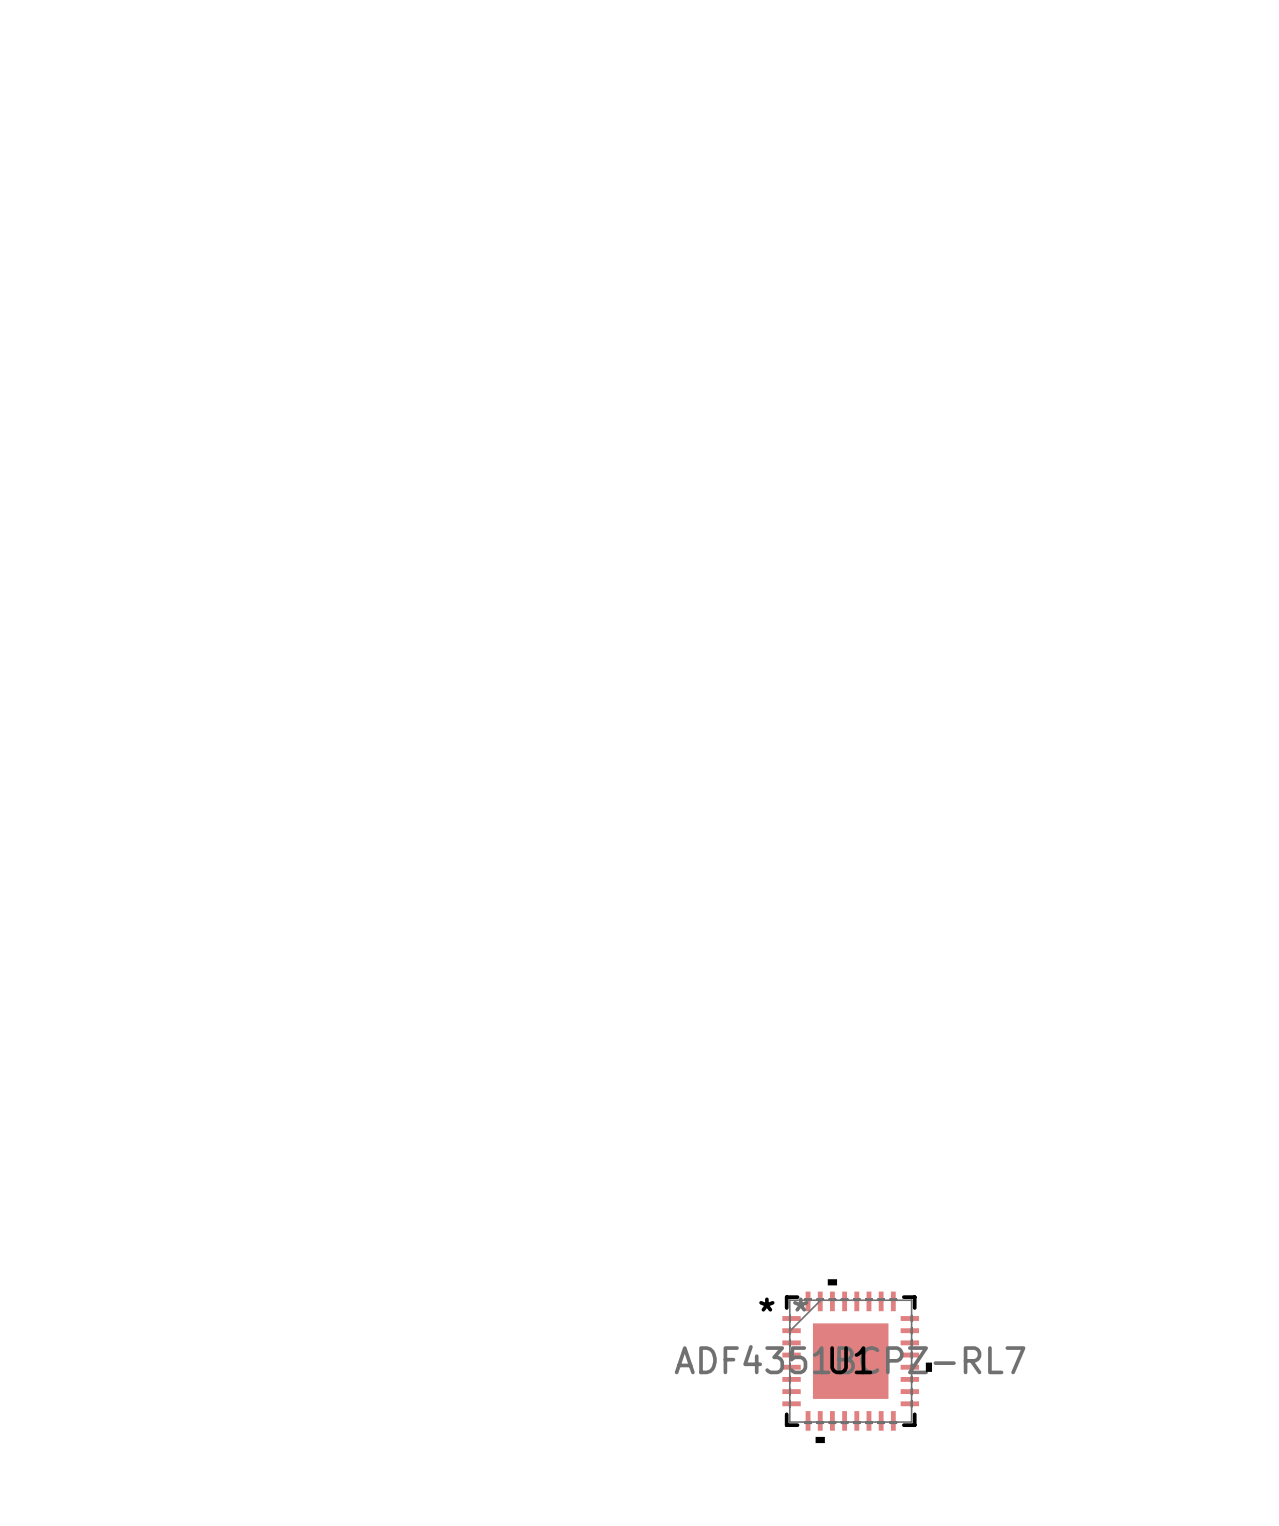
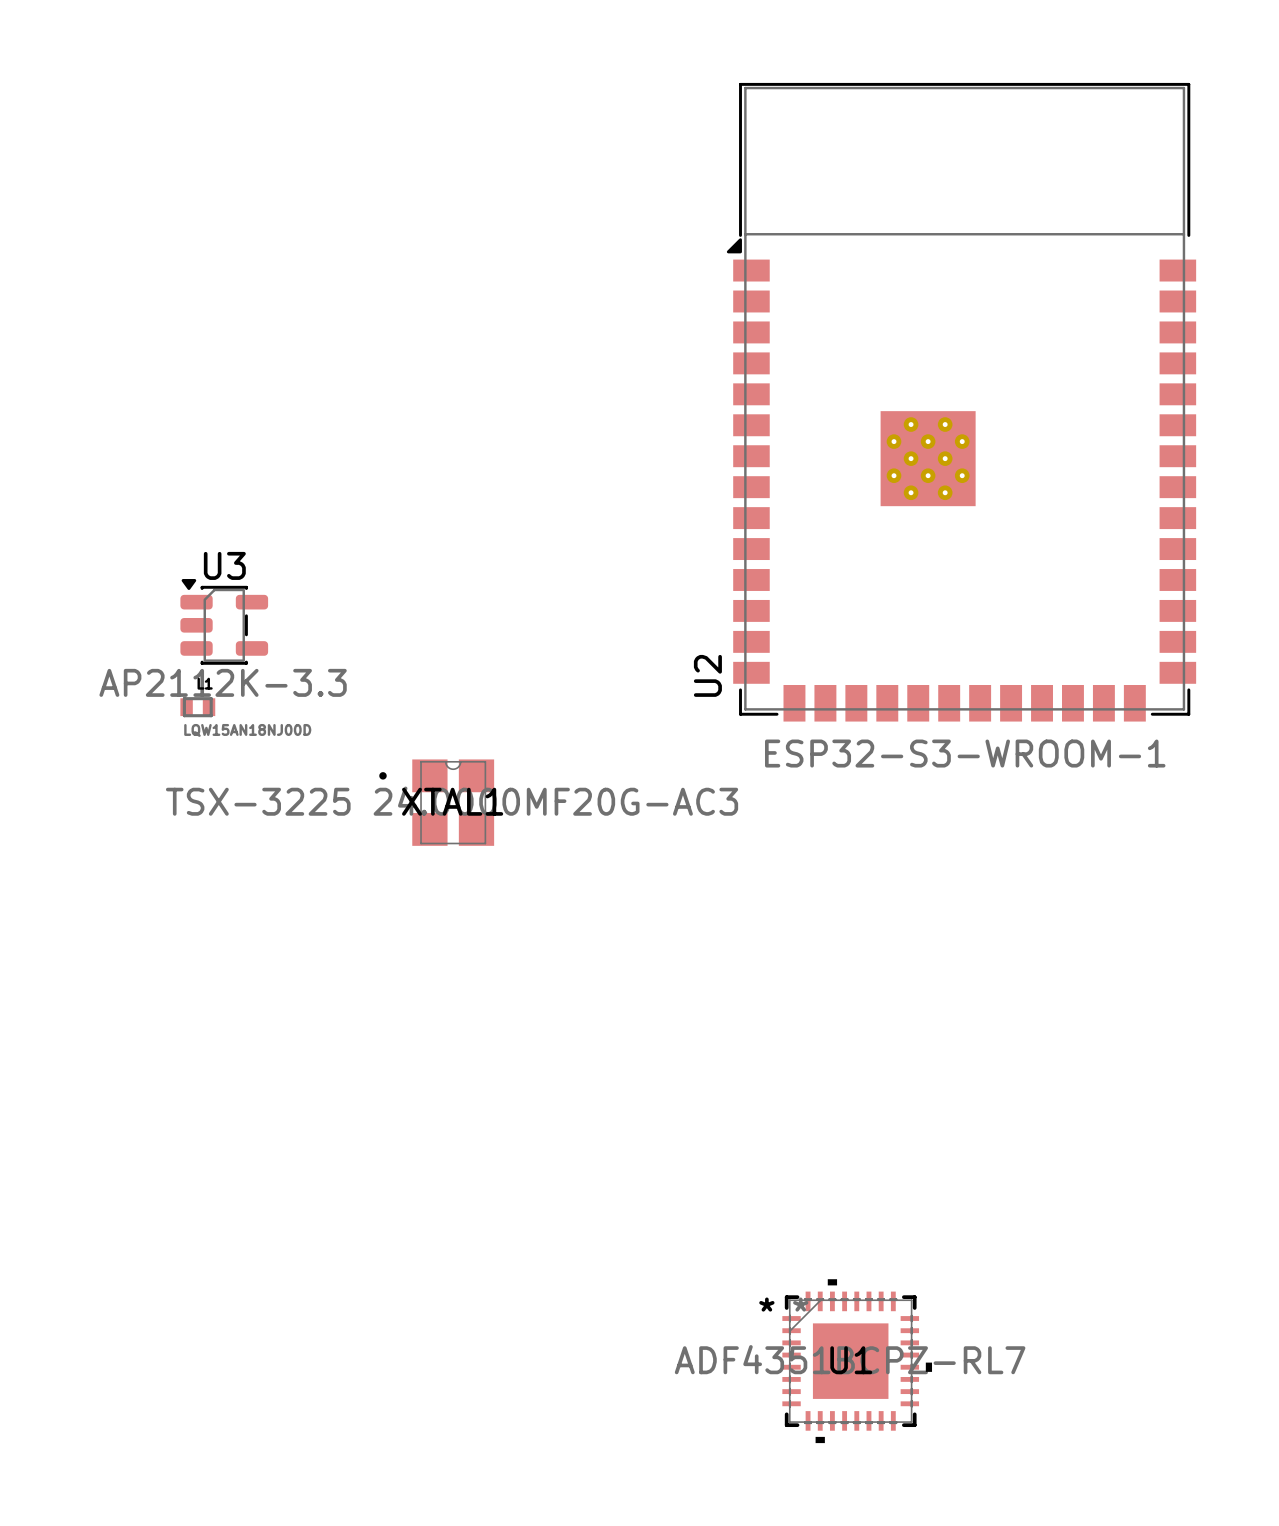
U2: none -> ESP32-S3-WROOM-1 (961, 402)
U3: none -> AP2112K-3.3 (224, 621)
L1: none -> LQW15AN18NJ00D (197, 707)
XTAL1: none -> TSX-3225 24.0000MF20G-AC3 (436, 802)

